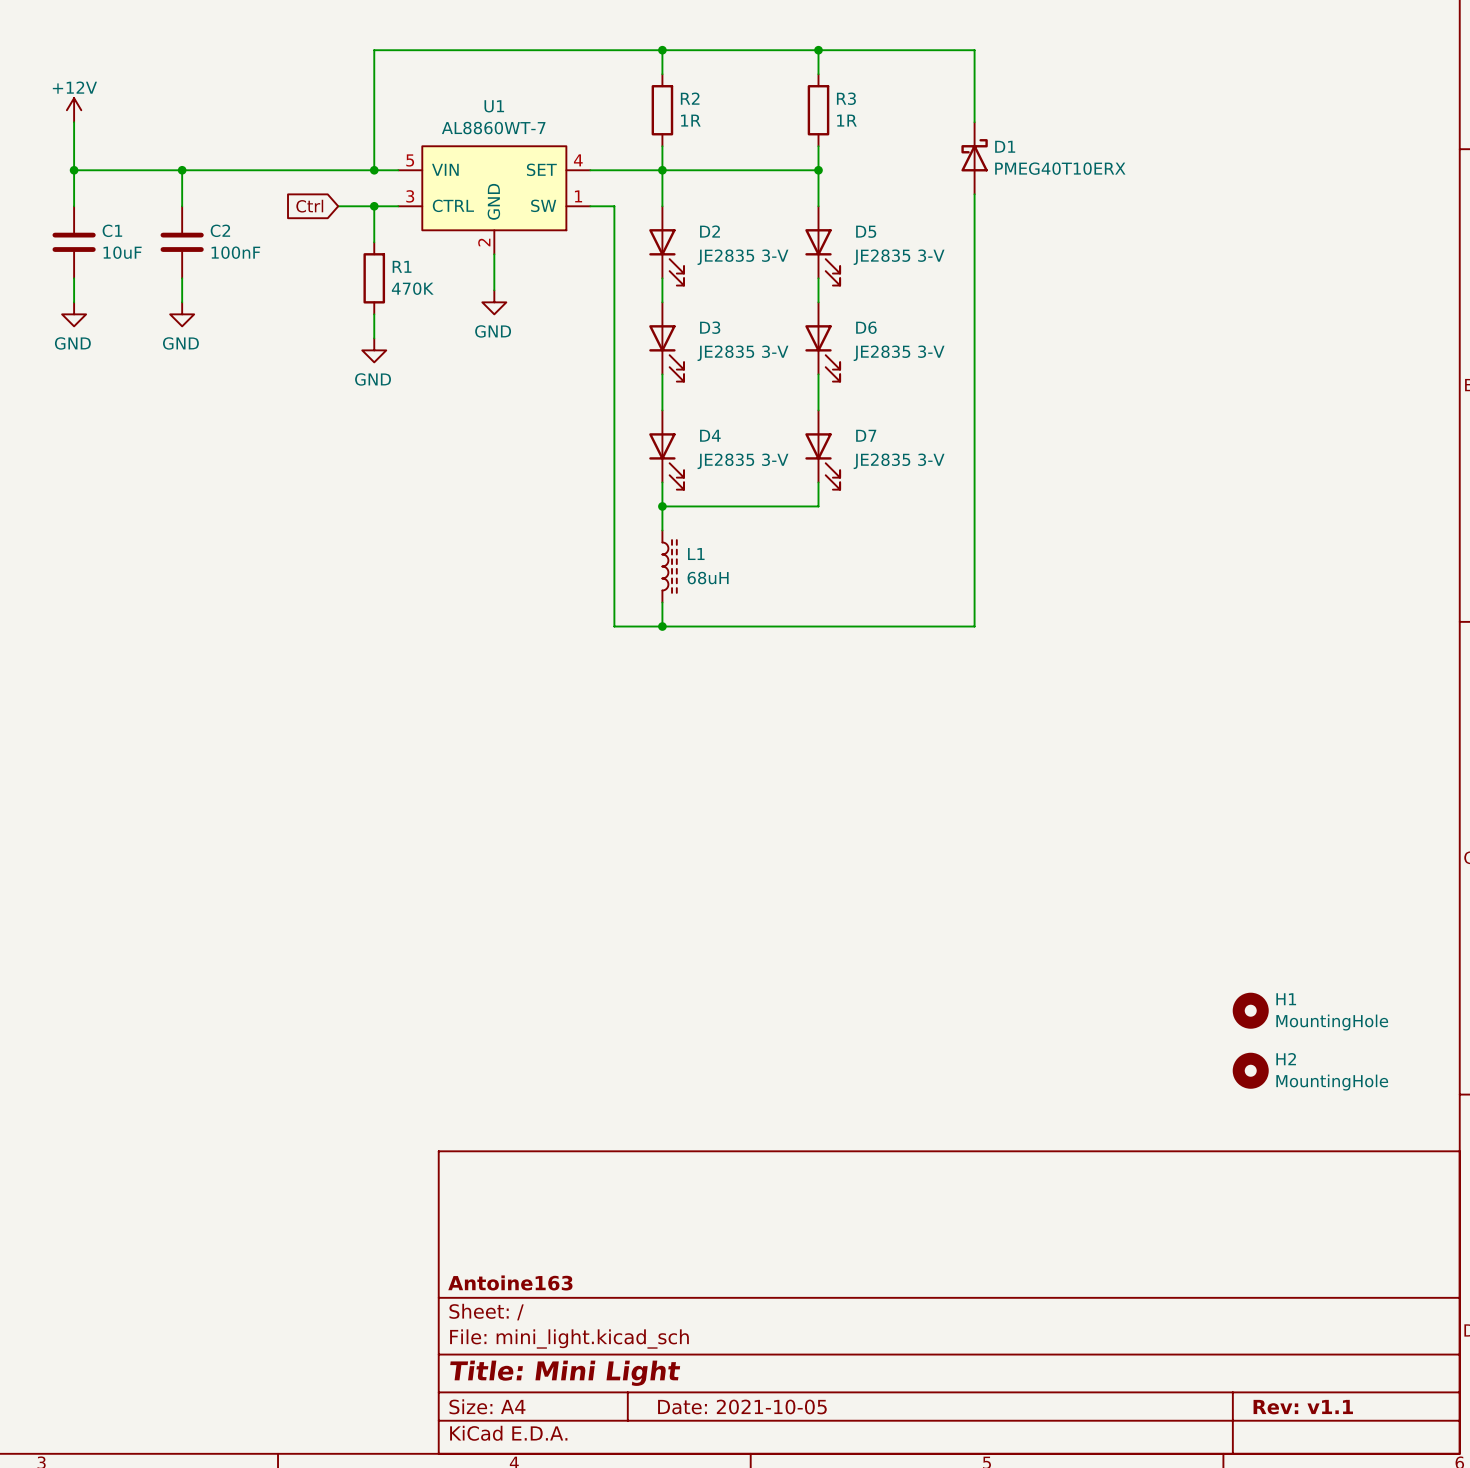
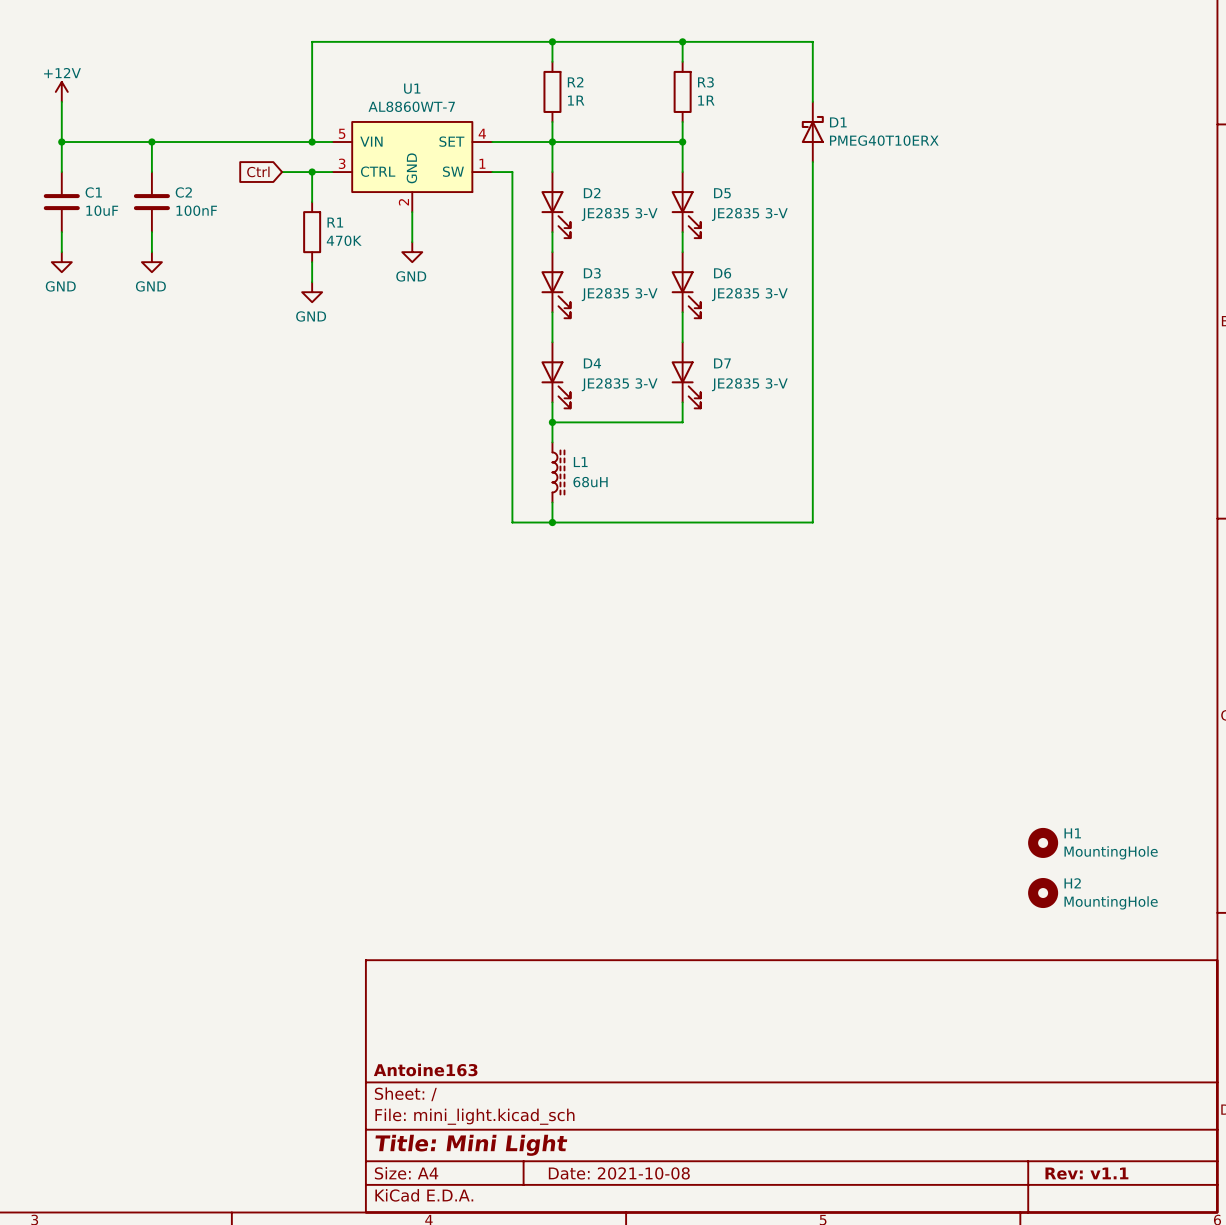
title block: Date: 2021-10-05 (742, 1406) -> Date: 2021-10-08 (619, 1173)

